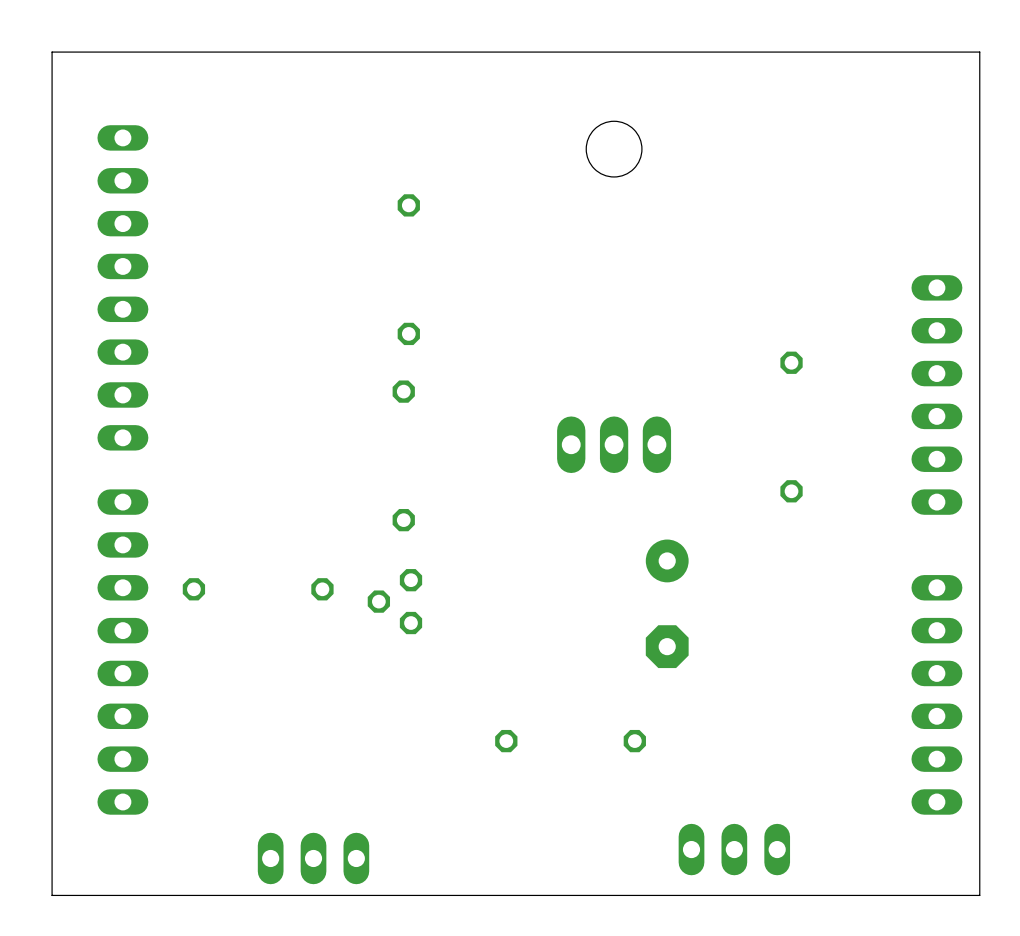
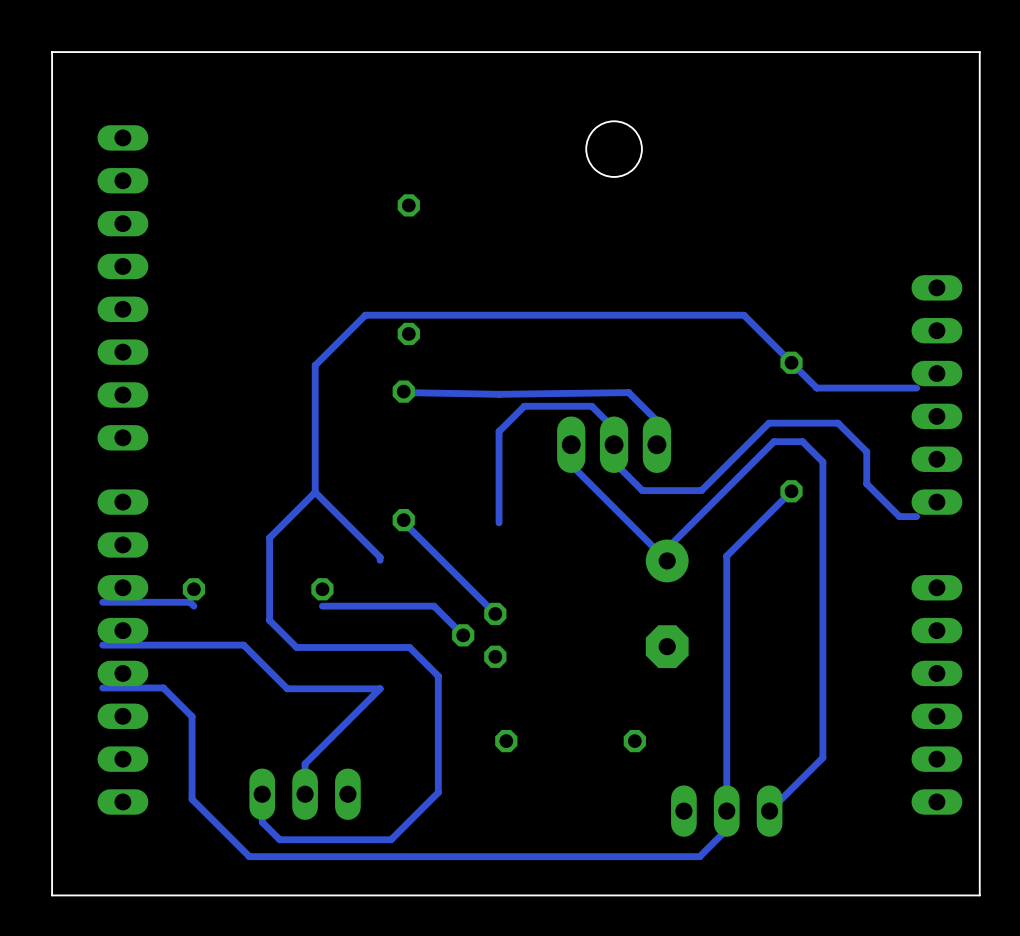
bottom track: none -> (916, 388) (816, 388) (743, 315) (365, 315) (315, 365) (315, 492)
bottom track: none -> (406, 392) (499, 394) (628, 392) (656, 420) (656, 444)
bottom track: none -> (571, 444) (571, 464) (667, 560) (667, 548) (773, 441) (802, 441) (822, 461) (822, 757) (769, 811)
bottom track: none -> (791, 491) (726, 556) (726, 829) (699, 856) (249, 856) (192, 799) (192, 716) (163, 687) (102, 687)
bottom track: none -> (315, 492) (380, 557) (380, 560)
bottom track: none -> (315, 492) (269, 537) (269, 620) (296, 647) (409, 647) (438, 676) (438, 792) (391, 839) (279, 839) (262, 822) (262, 794)
bottom track: none -> (916, 516) (899, 516) (866, 483) (866, 451) (838, 423) (768, 423) (701, 490) (642, 490) (614, 462) (614, 428) (591, 406) (524, 406) (499, 431) (499, 522)
bottom track: none -> (406, 521) (406, 524) (495, 613)
part position: (394, 601) -> (479, 635)
bottom track: none -> (102, 602) (190, 602) (193, 606)
bottom track: none -> (322, 606) (434, 606) (463, 635)
bottom track: none -> (102, 645) (243, 645) (287, 688) (380, 688) (305, 763) (305, 794)
part position: (734, 849) -> (726, 811)
part position: (313, 858) -> (305, 794)

